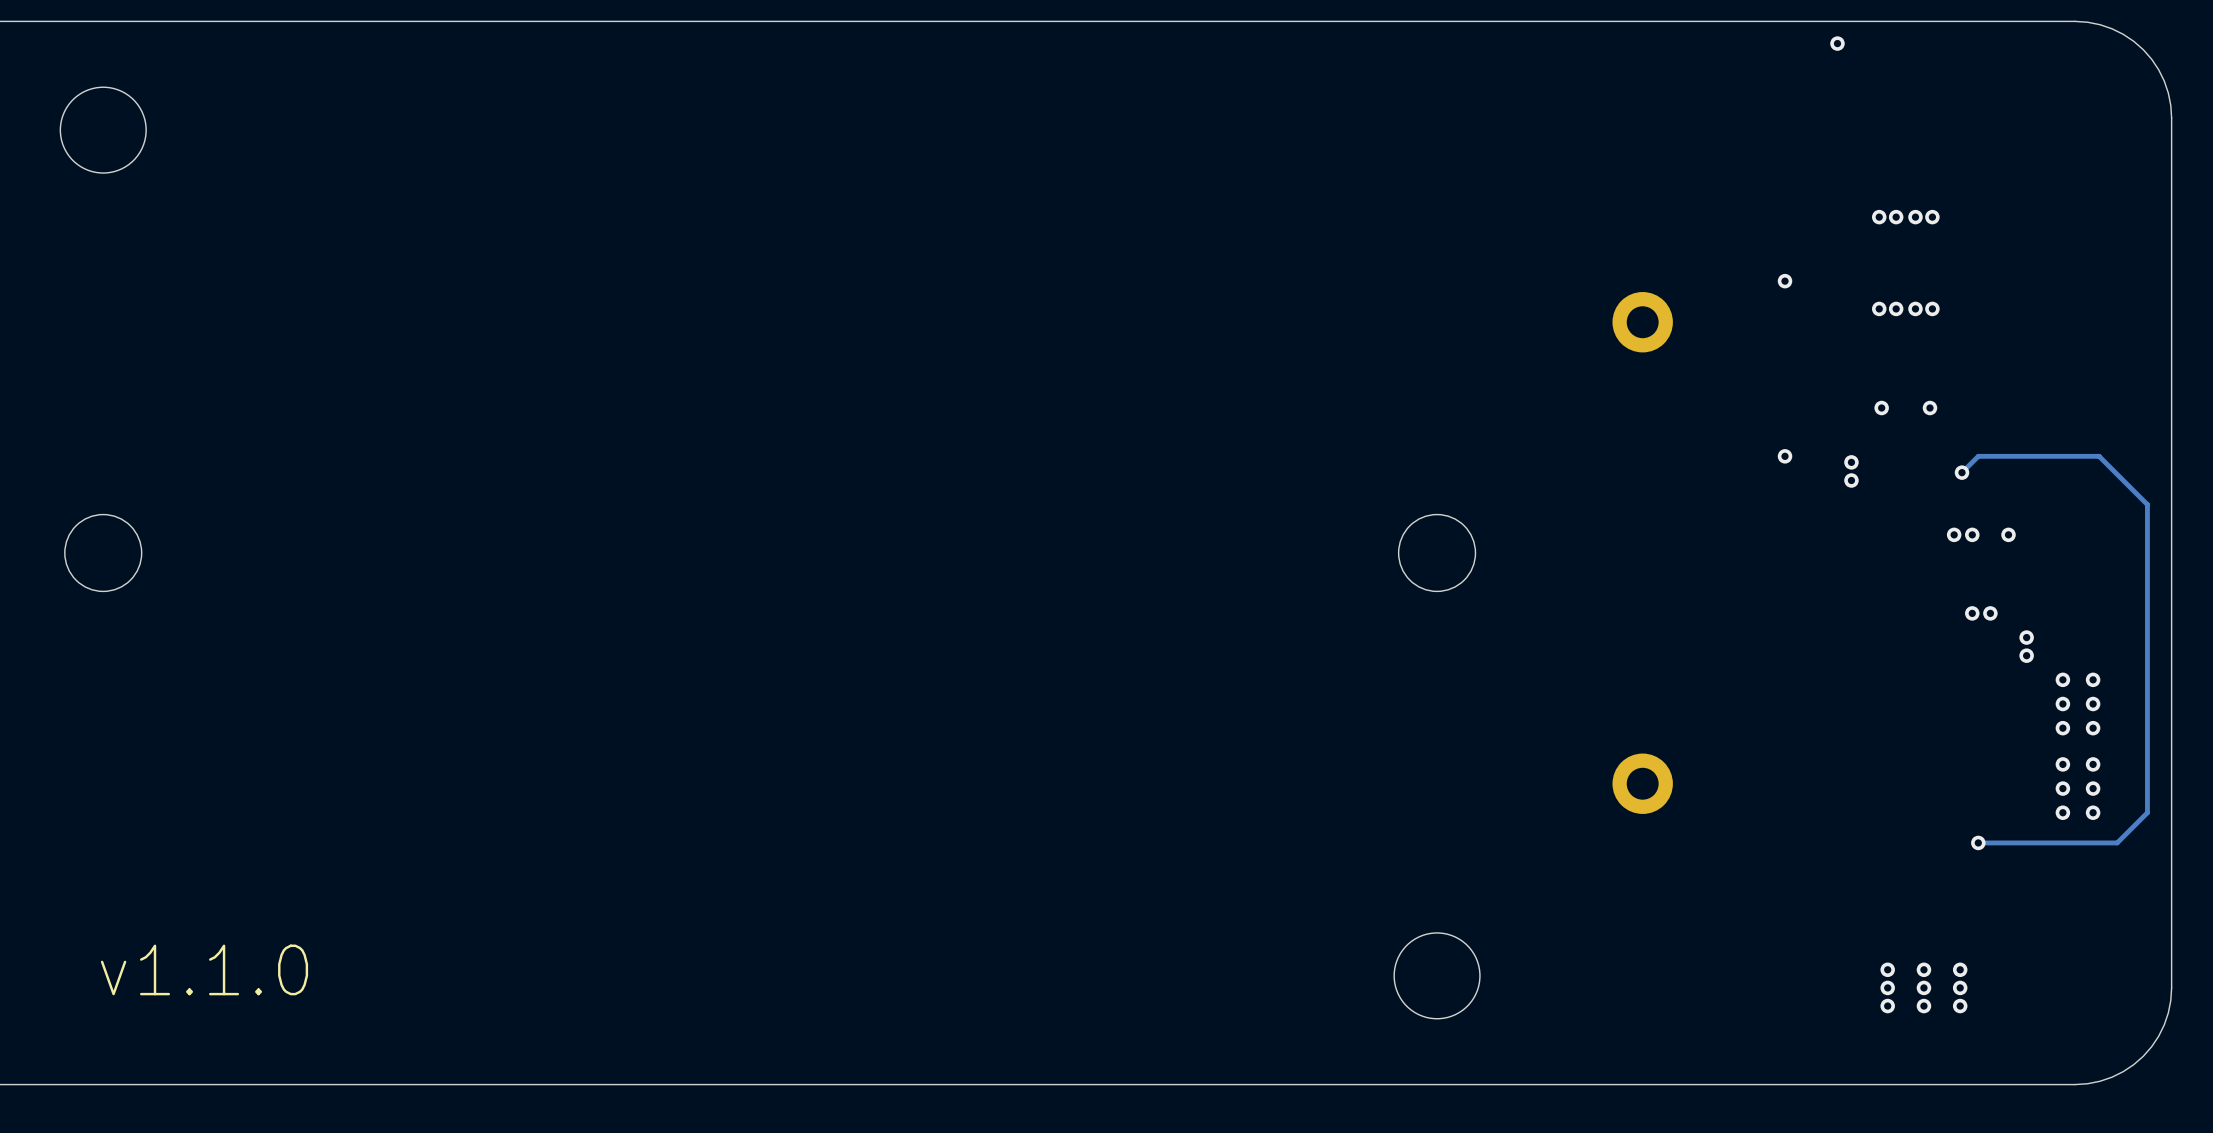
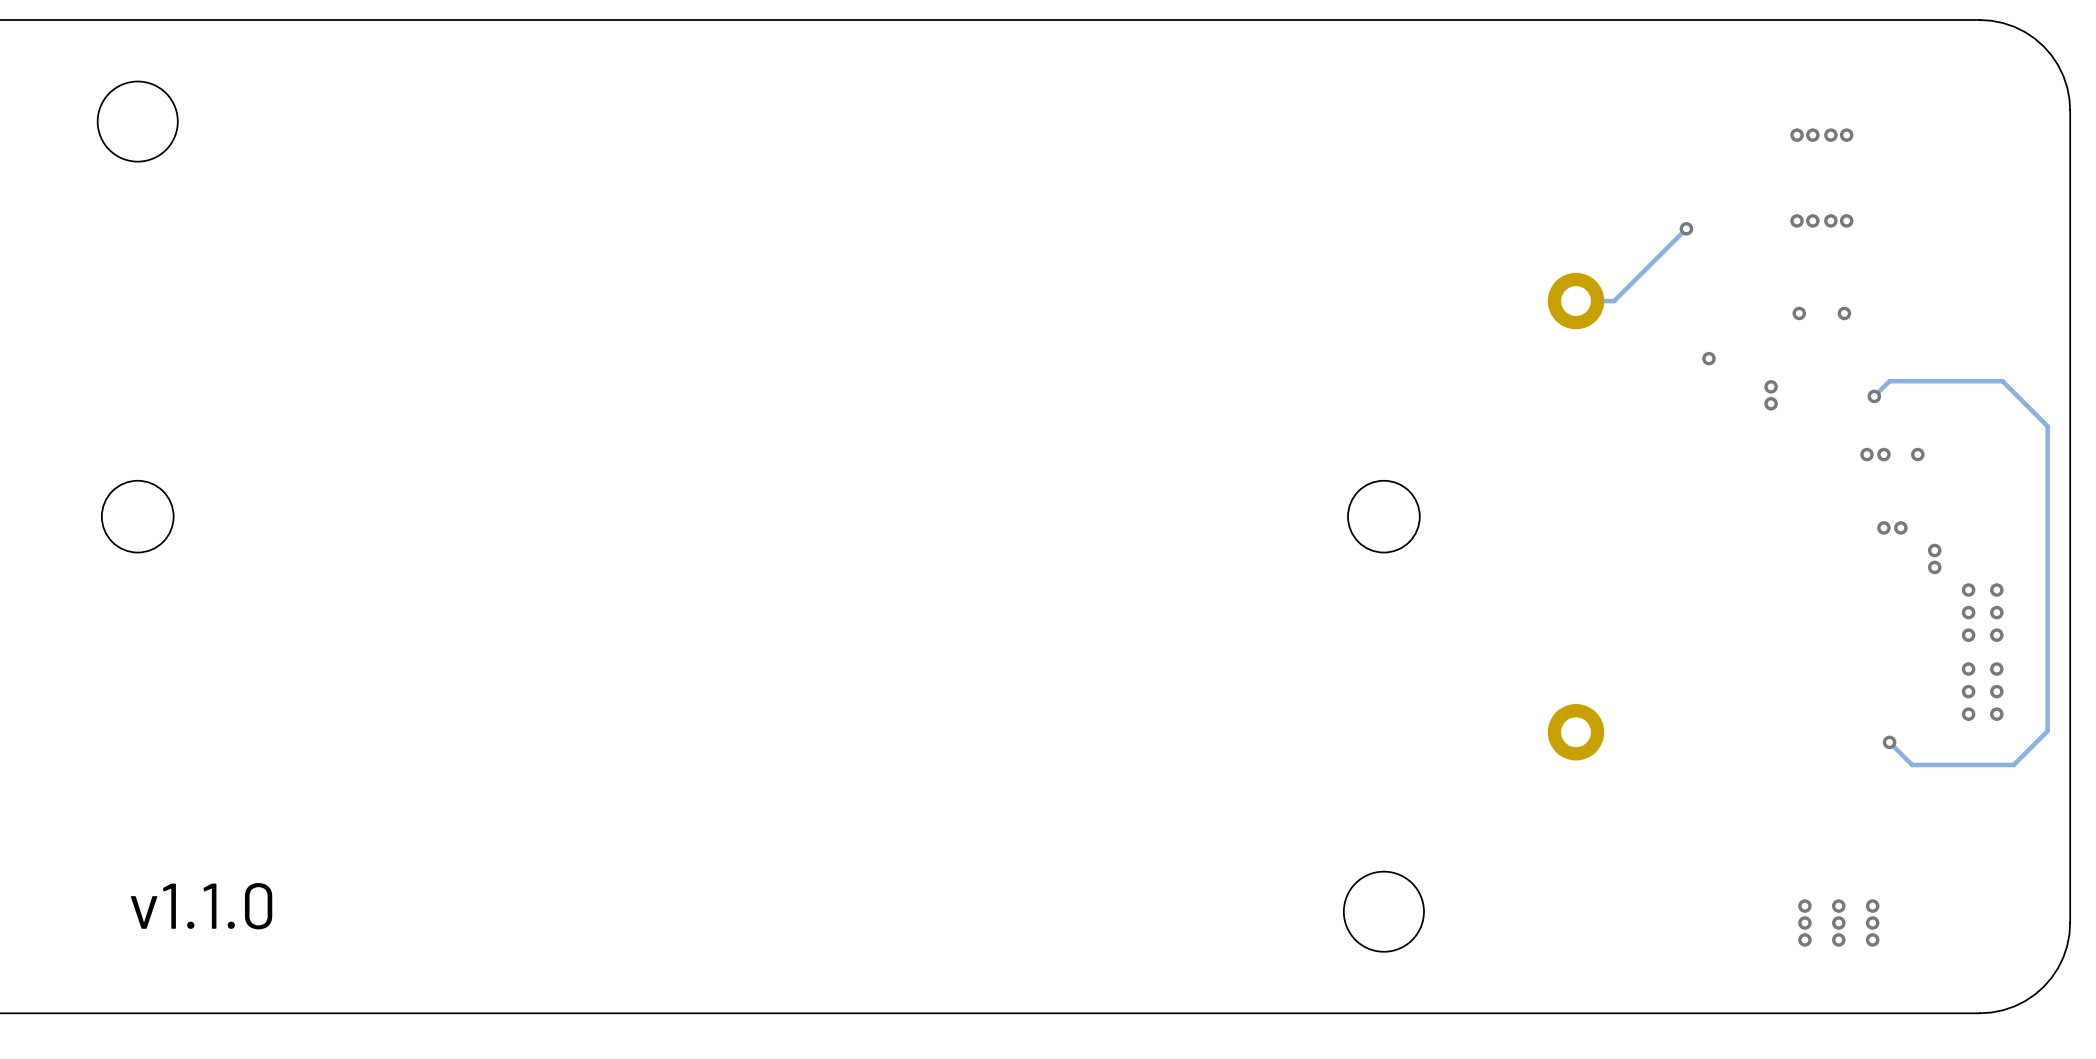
via: (1837, 43) -> none
via: none -> (1797, 135)
via: none -> (1812, 135)
via: none -> (1830, 135)
via: none -> (1846, 135)
via: (1879, 217) -> none
via: (1896, 217) -> none
via: (1915, 217) -> none
via: (1932, 217) -> none
via: none -> (1797, 220)
via: none -> (1812, 220)
via: none -> (1830, 220)
via: none -> (1846, 220)
track: none -> (1686, 228) (1614, 301) (1576, 301)
via position: (1785, 281) -> (1686, 228)
via: (1879, 308) -> none
via: (1896, 308) -> none
via: (1915, 308) -> none
via: (1932, 308) -> none
via: none -> (1799, 313)
via: none -> (1844, 313)
via: none -> (1708, 358)
via: (1881, 408) -> none
via: (1929, 408) -> none
via: none -> (1771, 386)
via: none -> (1874, 396)
via: none -> (1771, 403)
via: (1785, 456) -> none
via: (1851, 462) -> none
track: (1962, 472) (1978, 456) (2099, 456) (2147, 504) -> (1874, 396) (1889, 381) (2002, 381) (2047, 426) (2047, 471)
via: (1962, 472) -> none
via: (1851, 480) -> none
via: none -> (1867, 454)
via: none -> (1883, 454)
via: none -> (1917, 454)
via: (1954, 534) -> none
via: (1972, 534) -> none
via: (2008, 534) -> none
via: none -> (1883, 527)
via: none -> (1900, 527)
via: none -> (1934, 550)
via: none -> (1934, 567)
via: (1972, 613) -> none
via: (1990, 613) -> none
via: none -> (1968, 590)
via: none -> (1996, 590)
via: (2026, 637) -> none
via: (2026, 655) -> none
via: none -> (1968, 612)
via: none -> (1996, 612)
via: (2062, 704) -> none
via: (2093, 704) -> none
via: none -> (1968, 669)
via: none -> (1996, 669)
via: (2062, 728) -> none
via: (2093, 728) -> none
via: none -> (1968, 691)
via: none -> (1996, 691)
track: (2147, 782) (2147, 812) (2117, 842) (1978, 842) -> (2047, 731) (2013, 764) (1912, 764) (1889, 742)
via: (2062, 788) -> none
via: (2093, 788) -> none
via: none -> (1889, 742)
via: (2062, 812) -> none
via: (2093, 812) -> none
via: (1978, 842) -> none

